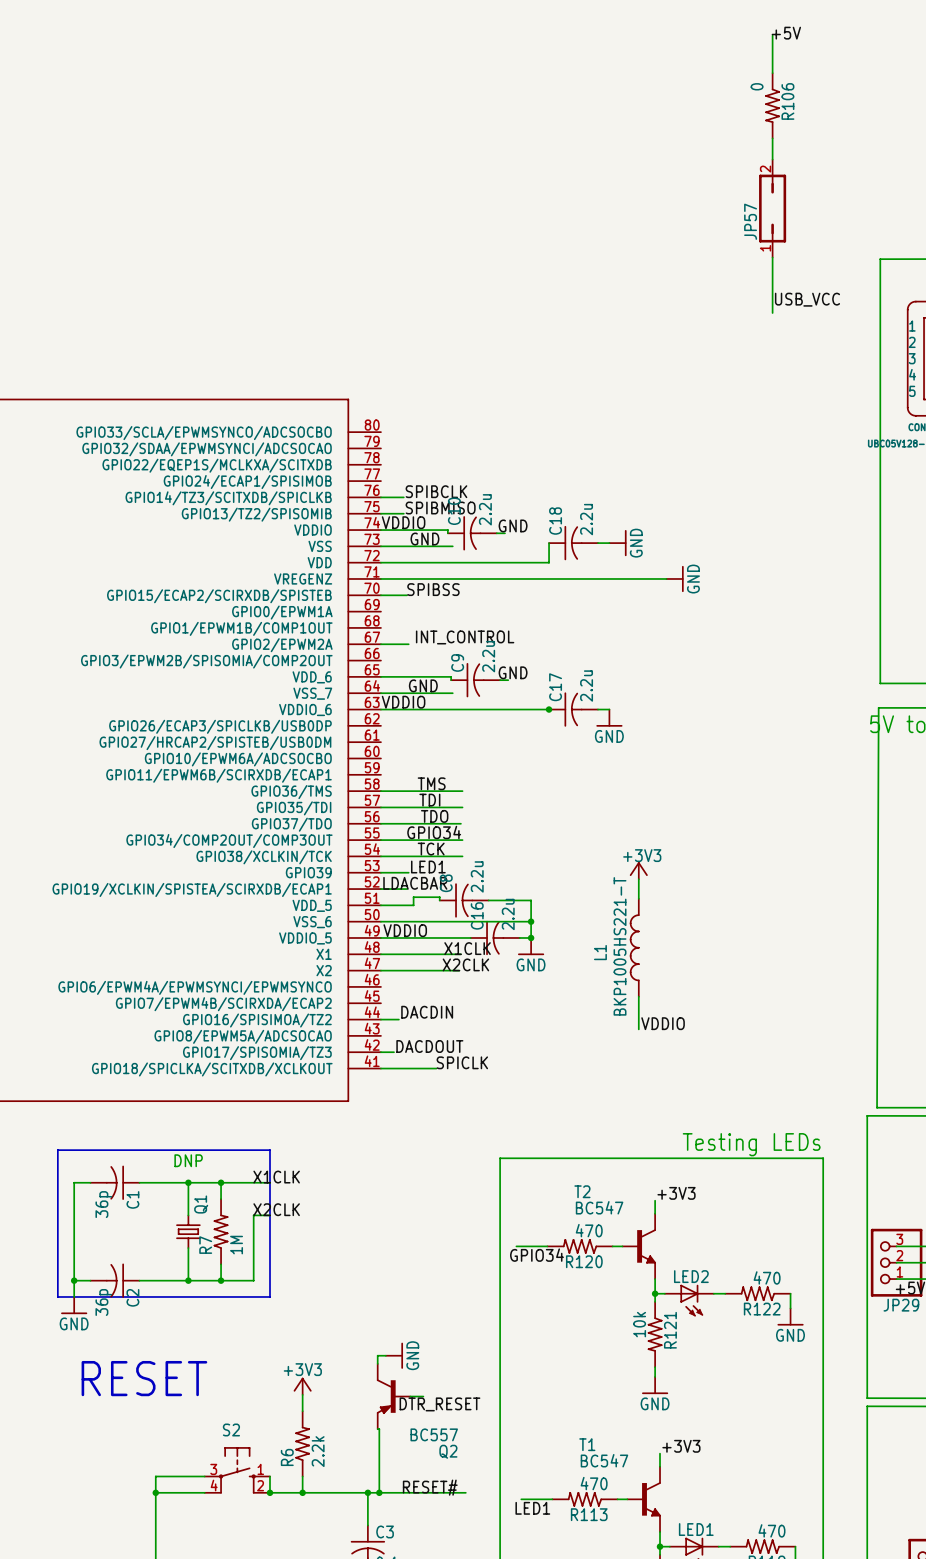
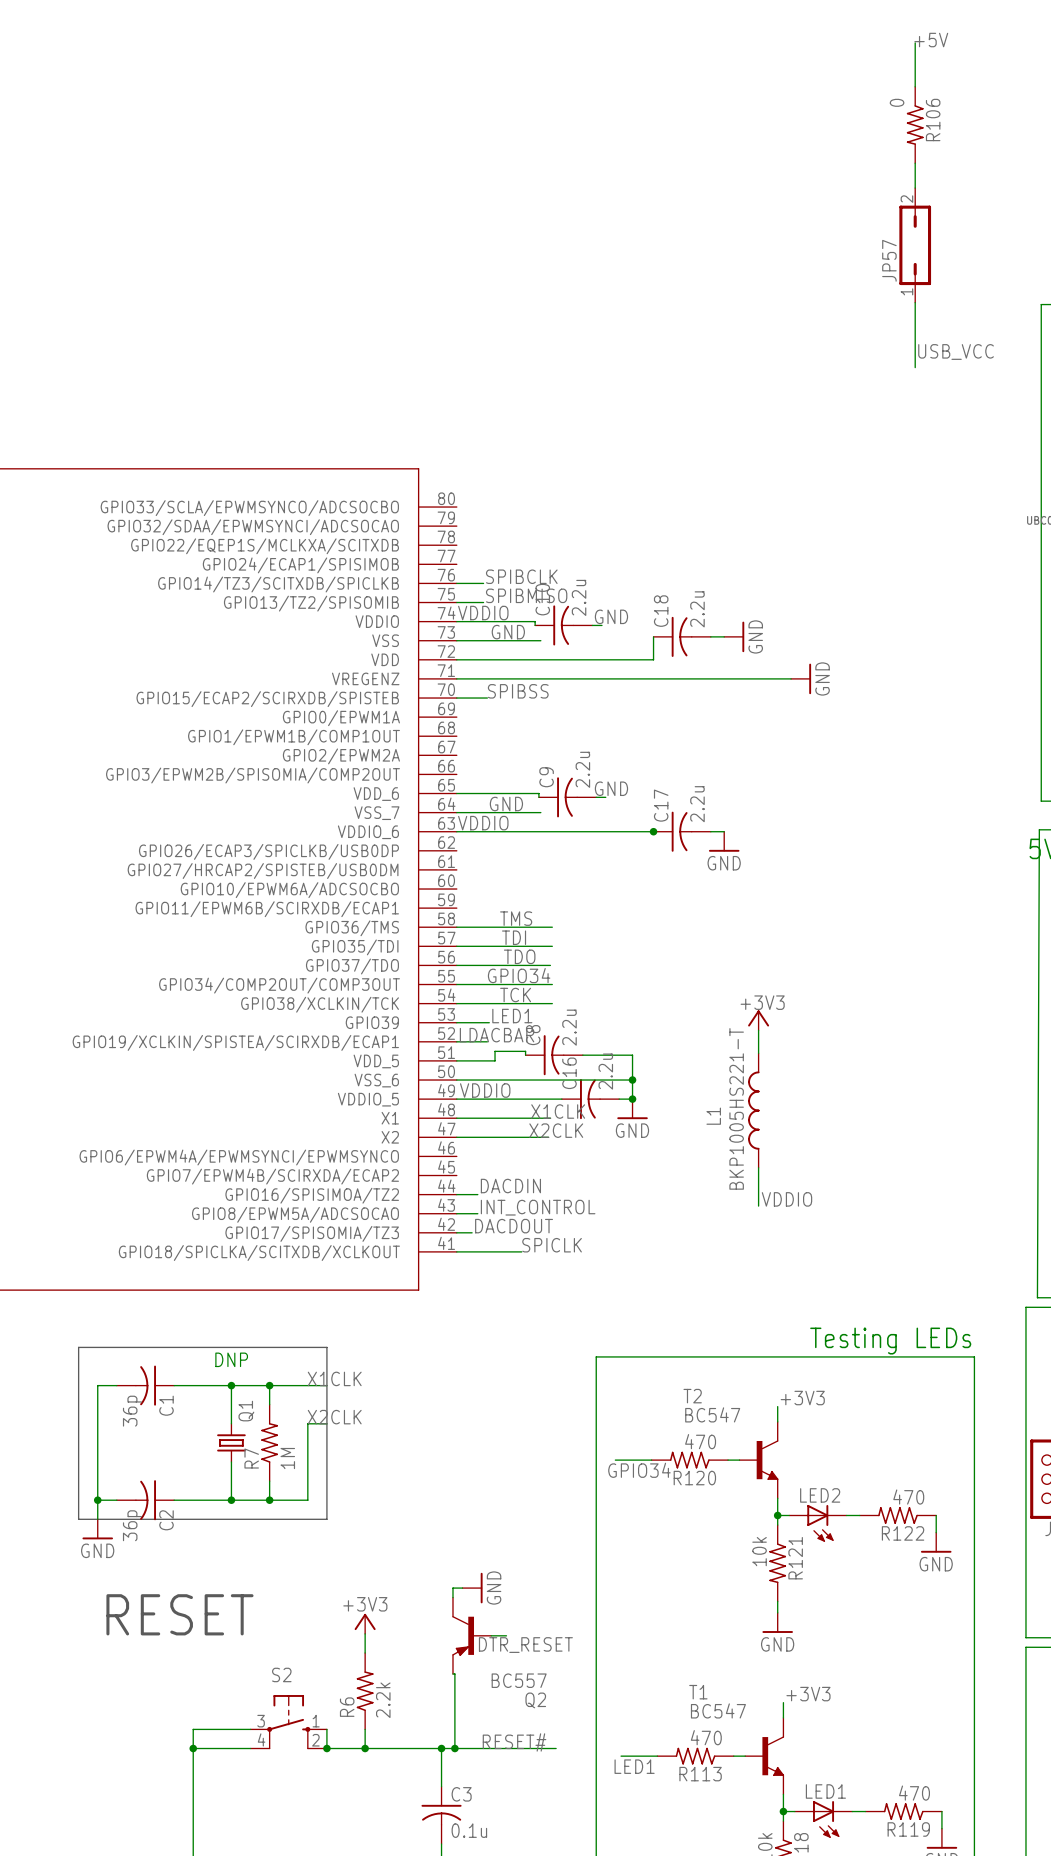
label: INT_CONTROL (465, 637) -> none
wire: (380, 644) (408, 644) -> none
label: none -> INT_CONTROL (538, 1207)
wire: none -> (456, 1213) (477, 1213)

